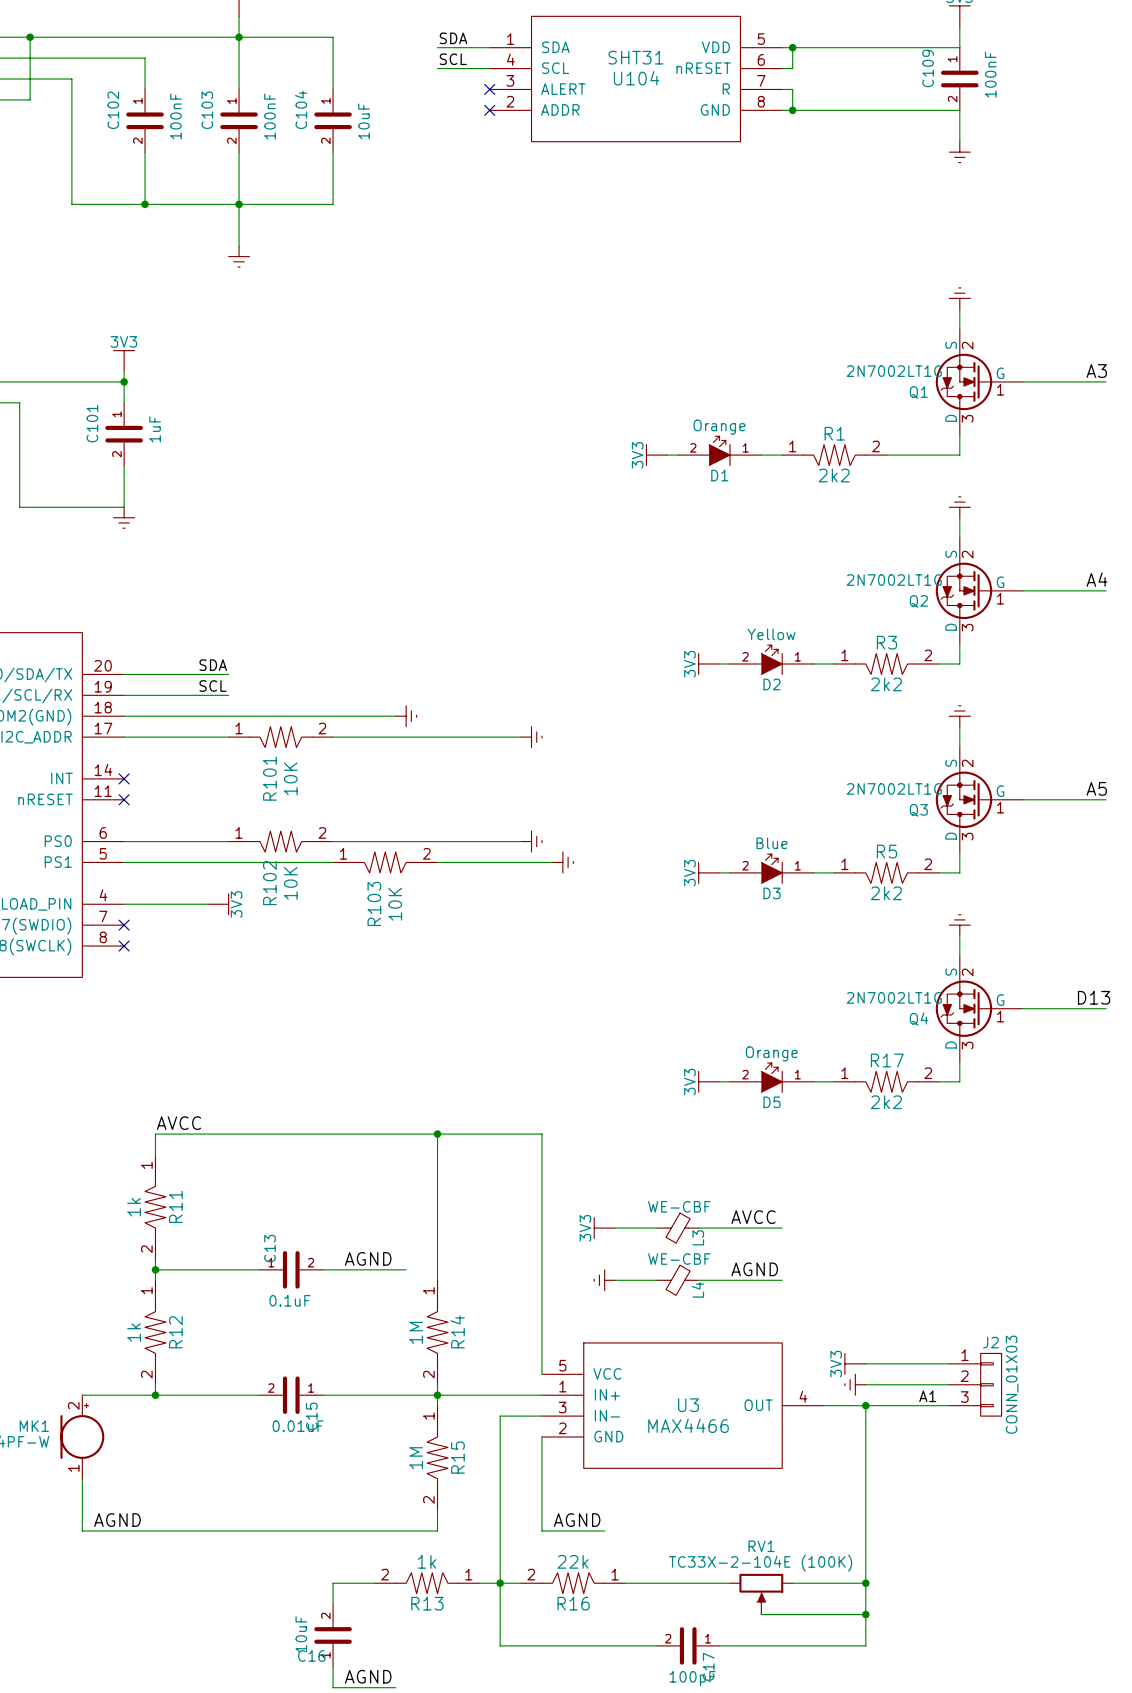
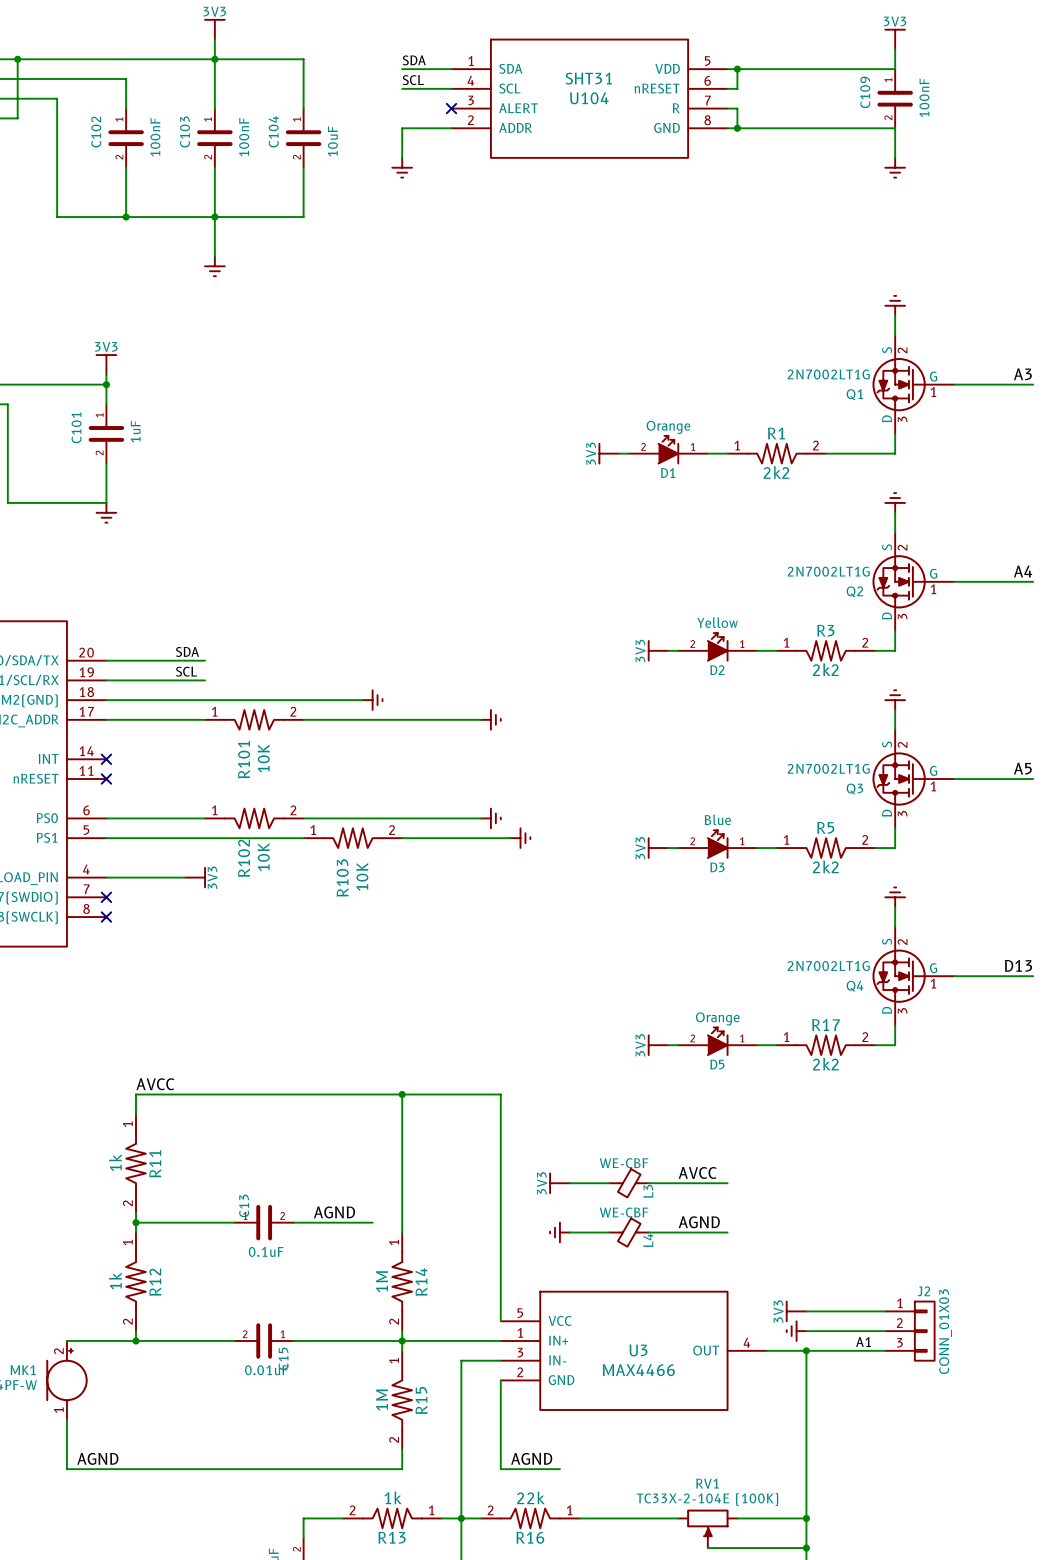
wire: none -> (451, 128) (402, 128) (402, 157)
no-connect mark: (489, 110) -> none
power symbol: none -> (402, 167)

